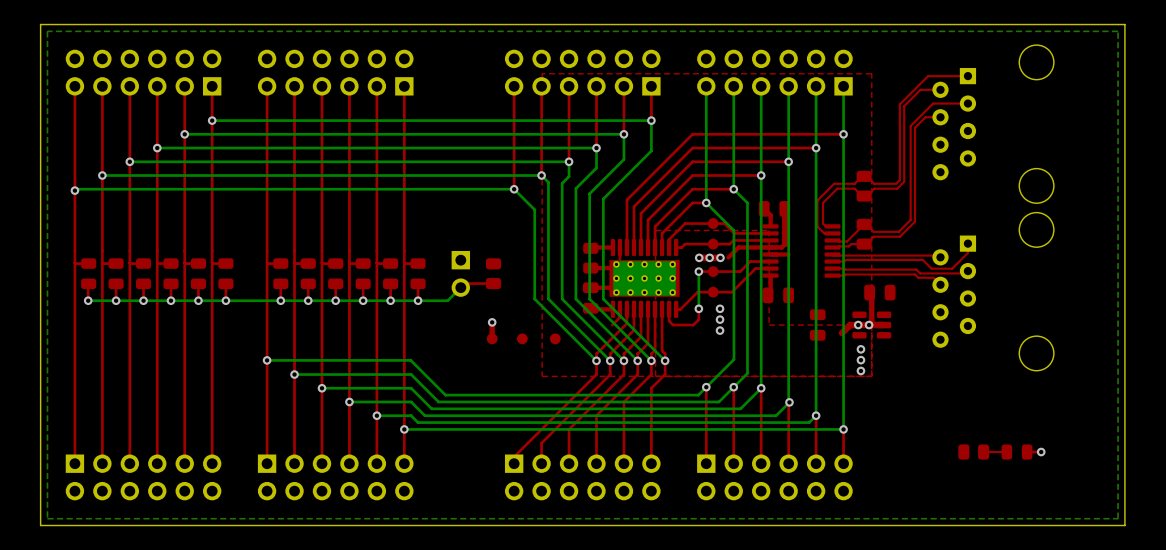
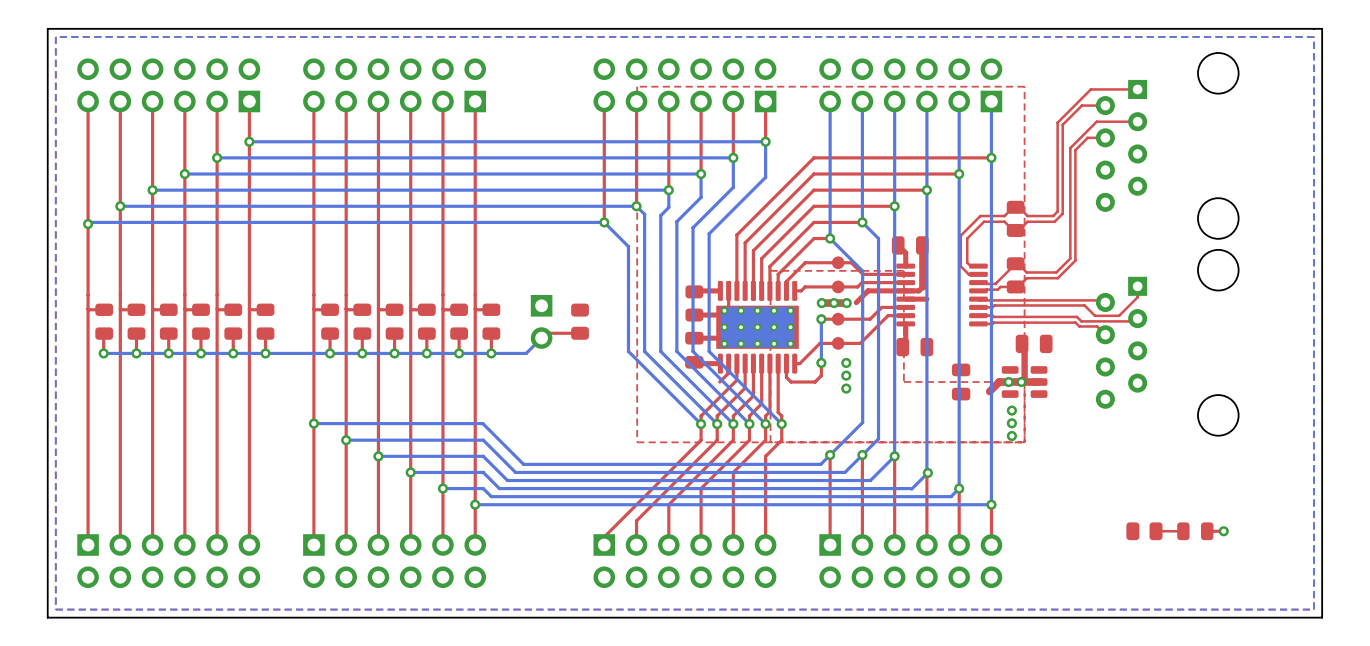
top track: (492, 322) (492, 338) -> none
via: (492, 322) -> none
part: (492, 338) -> none
part: (522, 338) -> none
part: (555, 338) -> none

